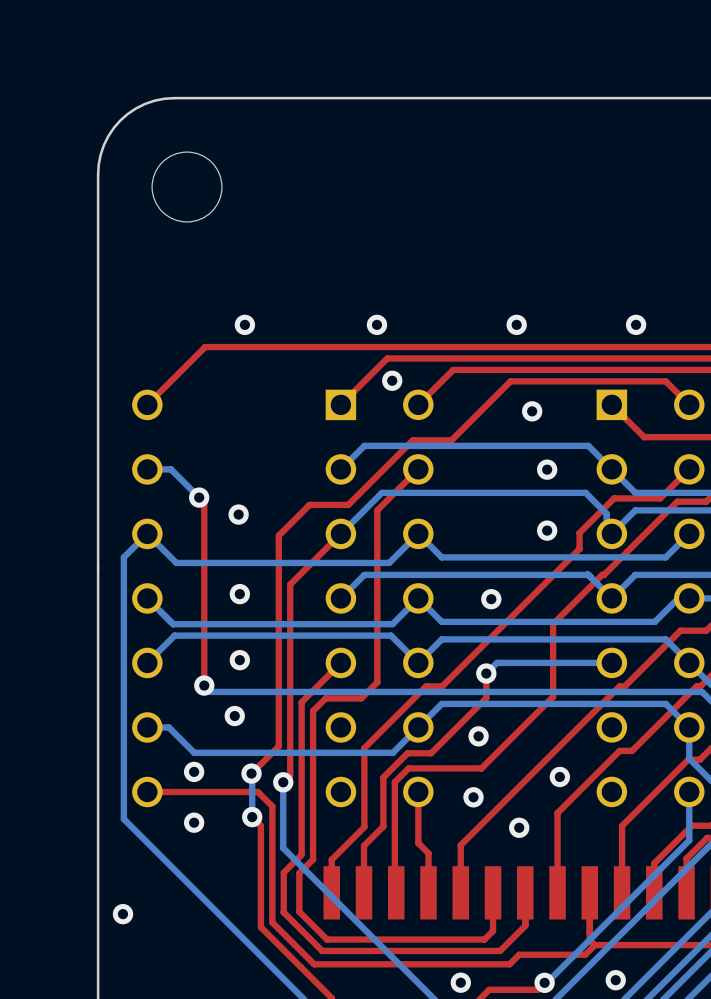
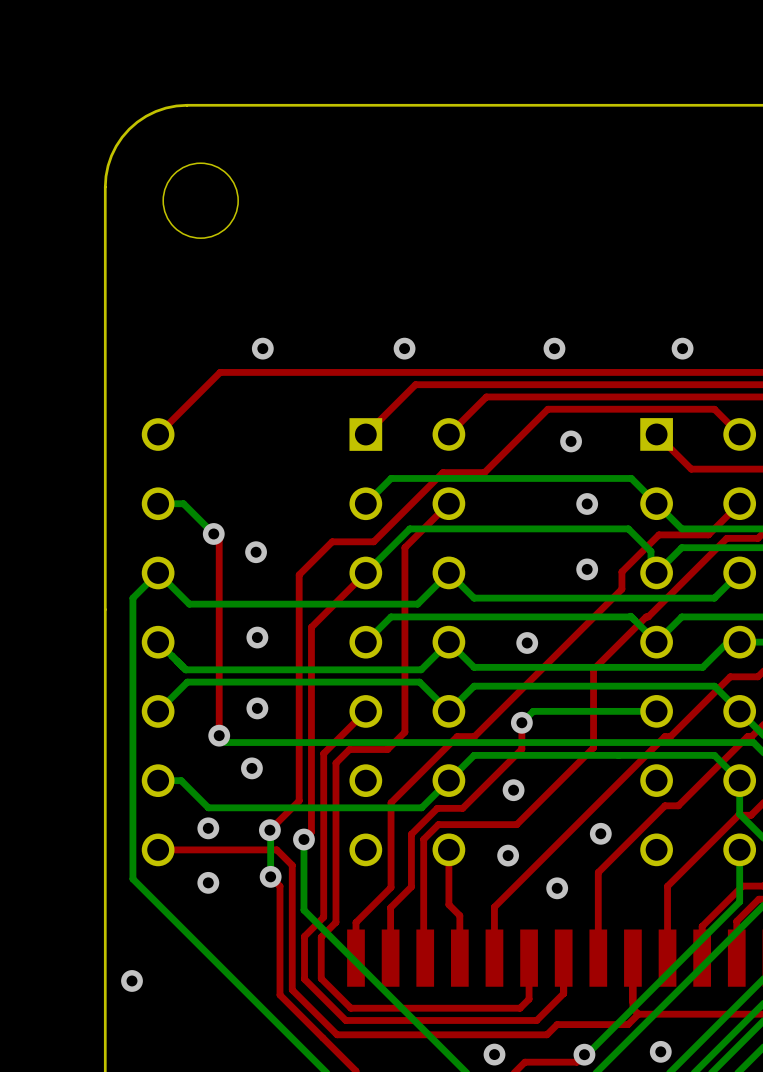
via: (392, 380) -> none

